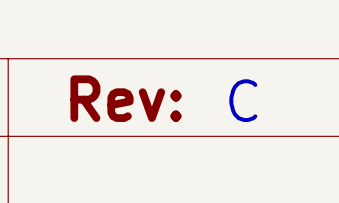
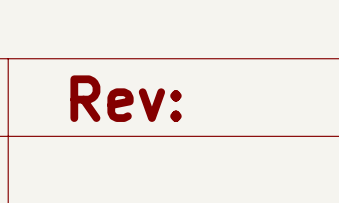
text: C (243, 100) -> none

